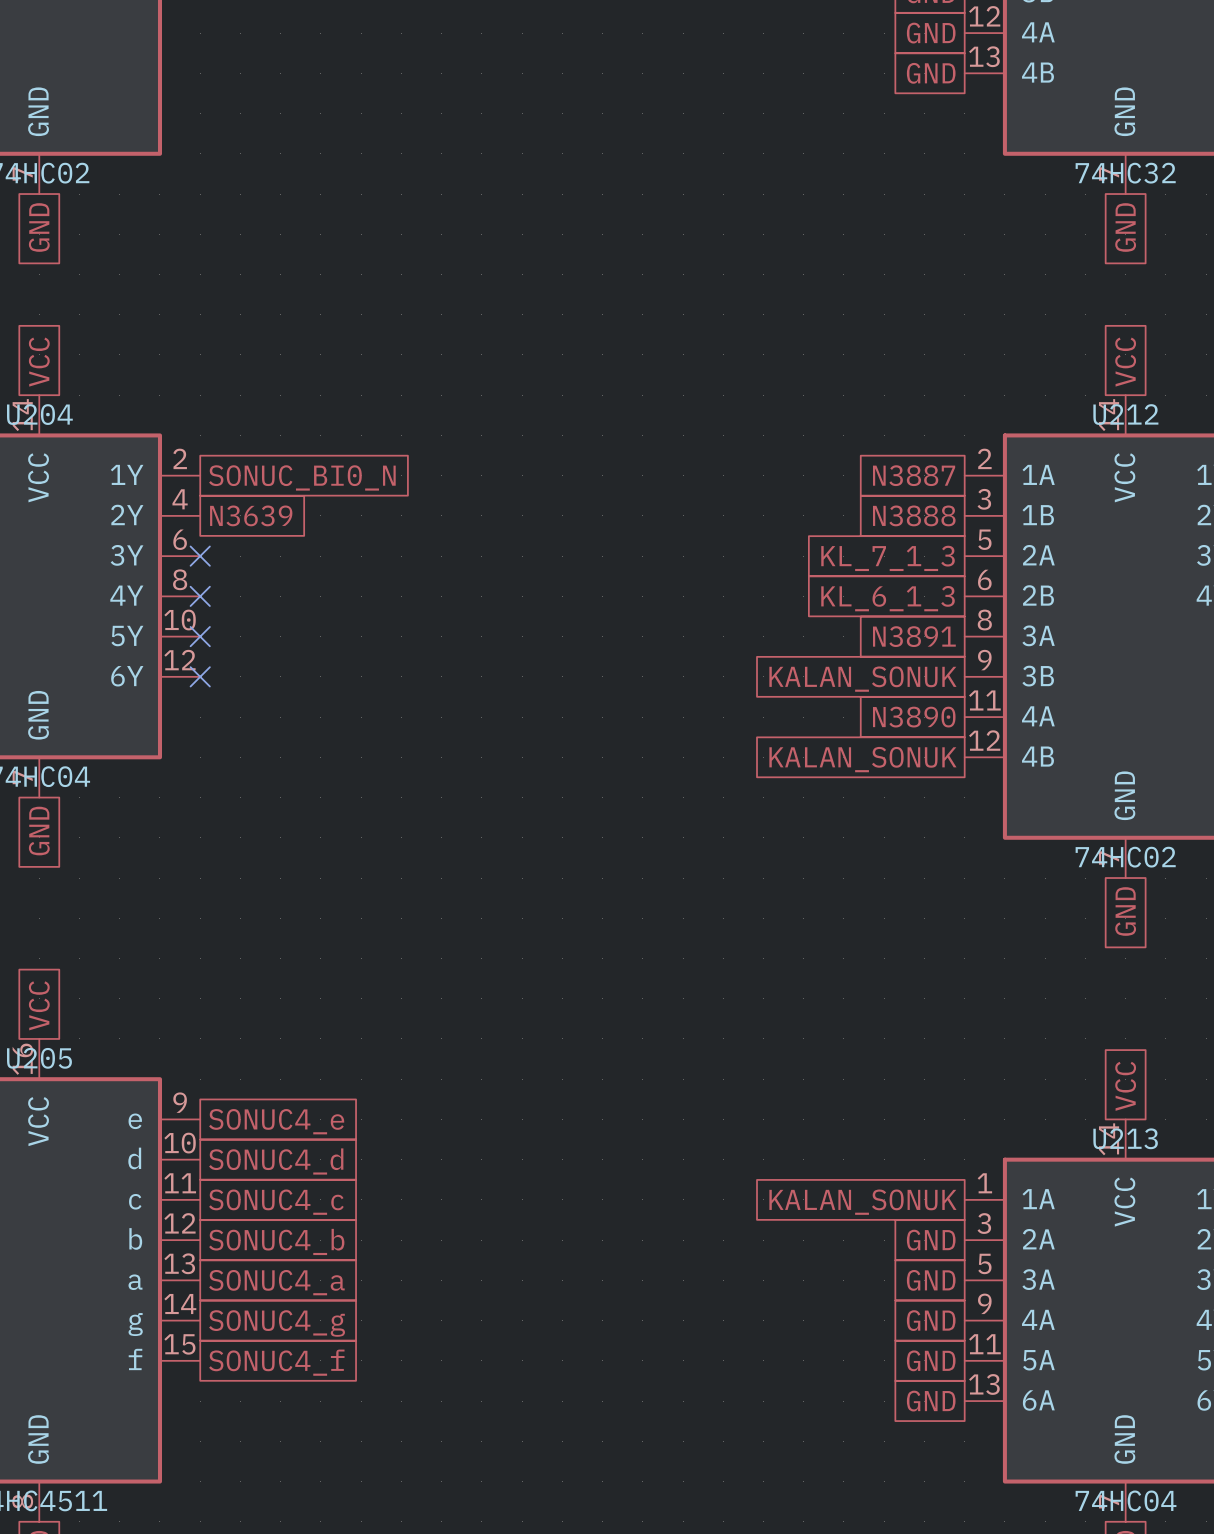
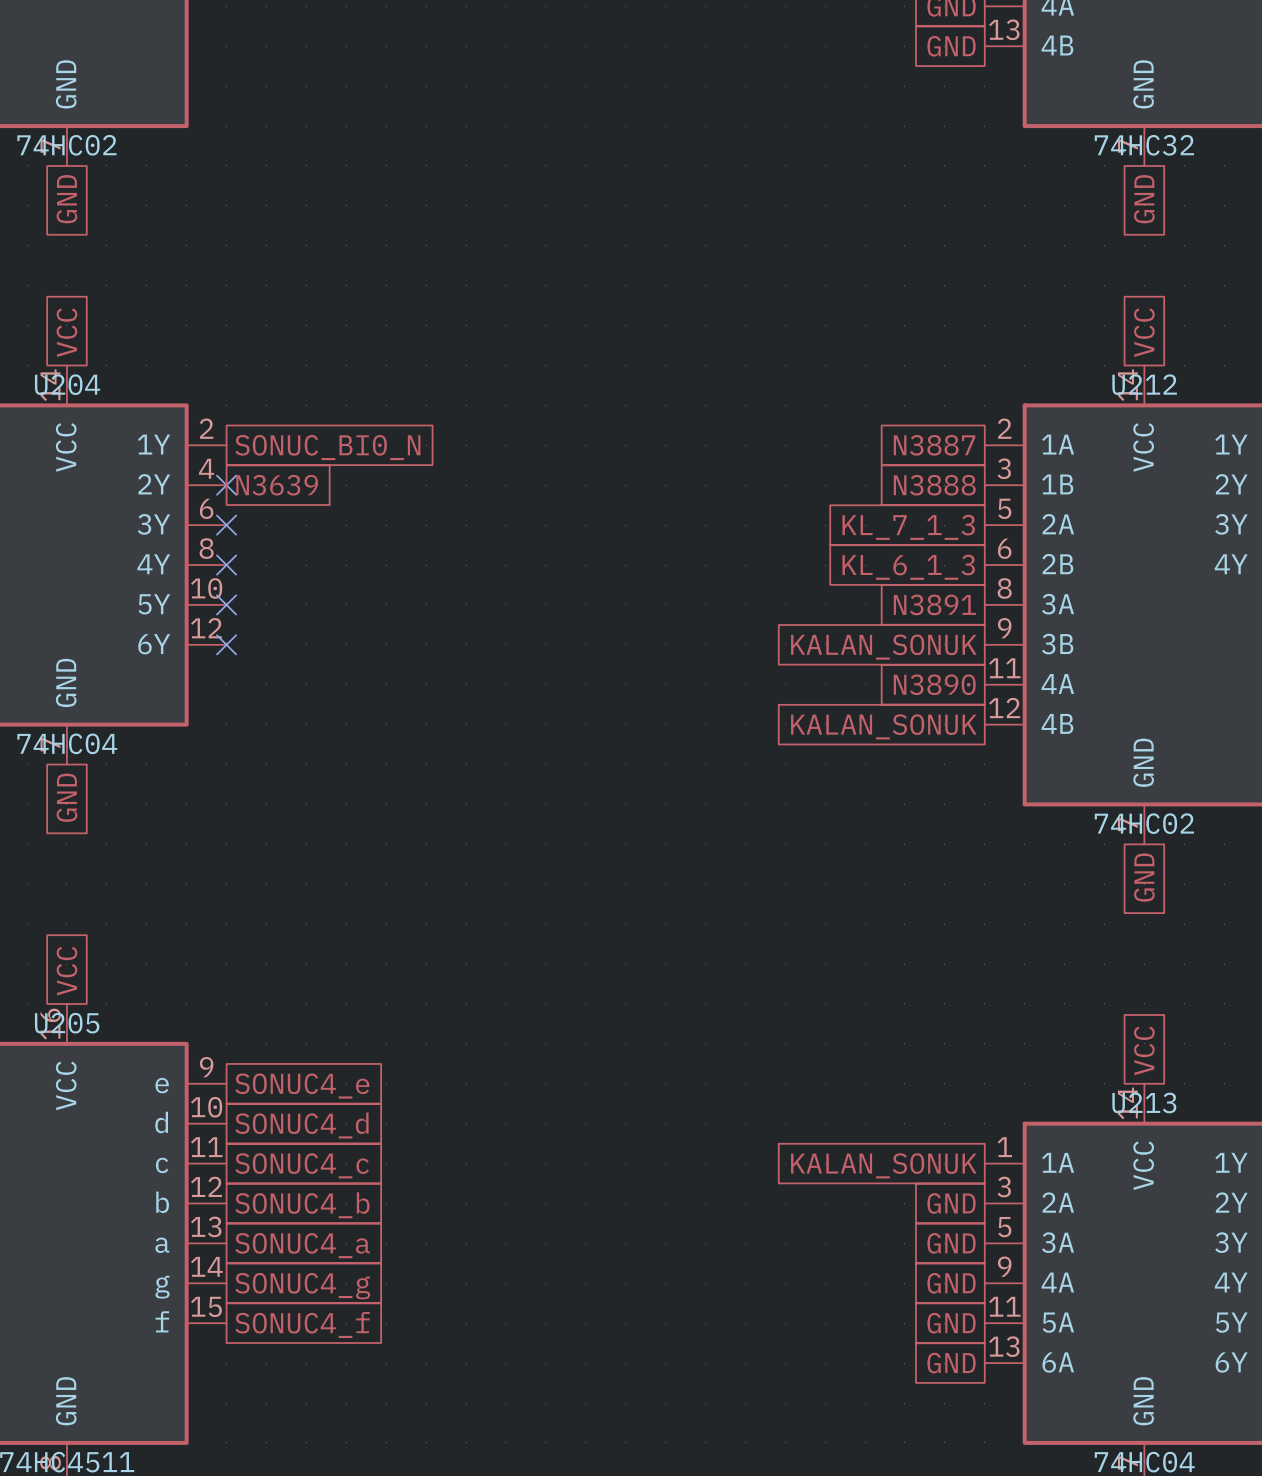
no-connect mark: none -> (226, 485)

